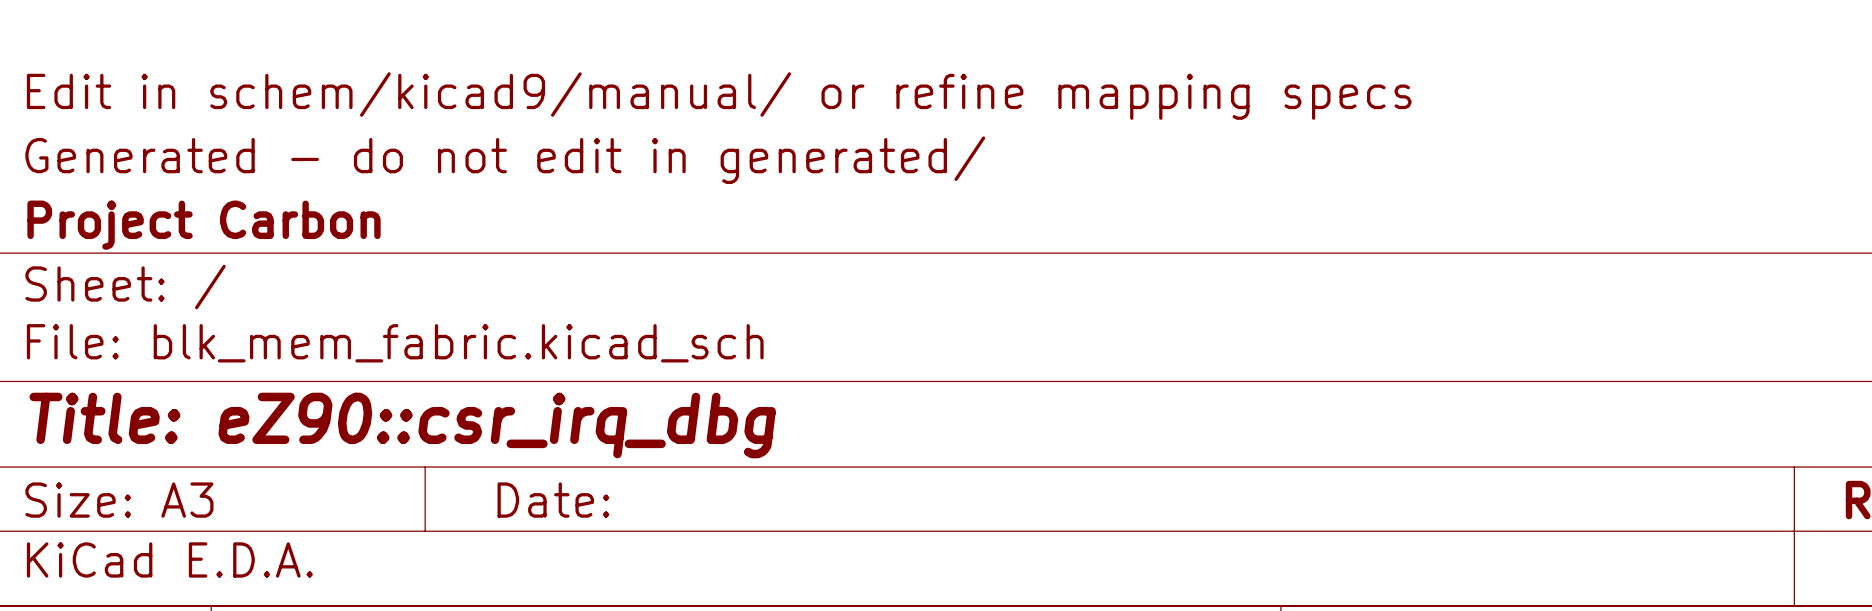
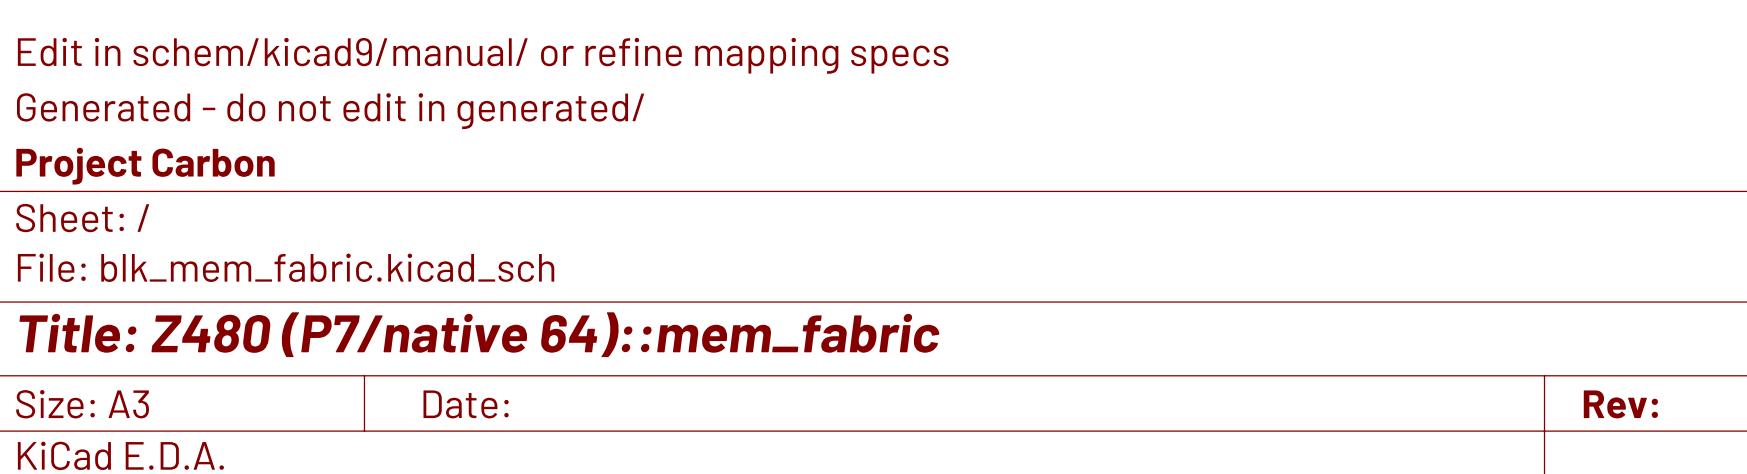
title block: Title: eZ90::csr_irq_dbg (402, 425) -> Title: Z480 (P7/native 64)::mem_fabric (479, 334)

